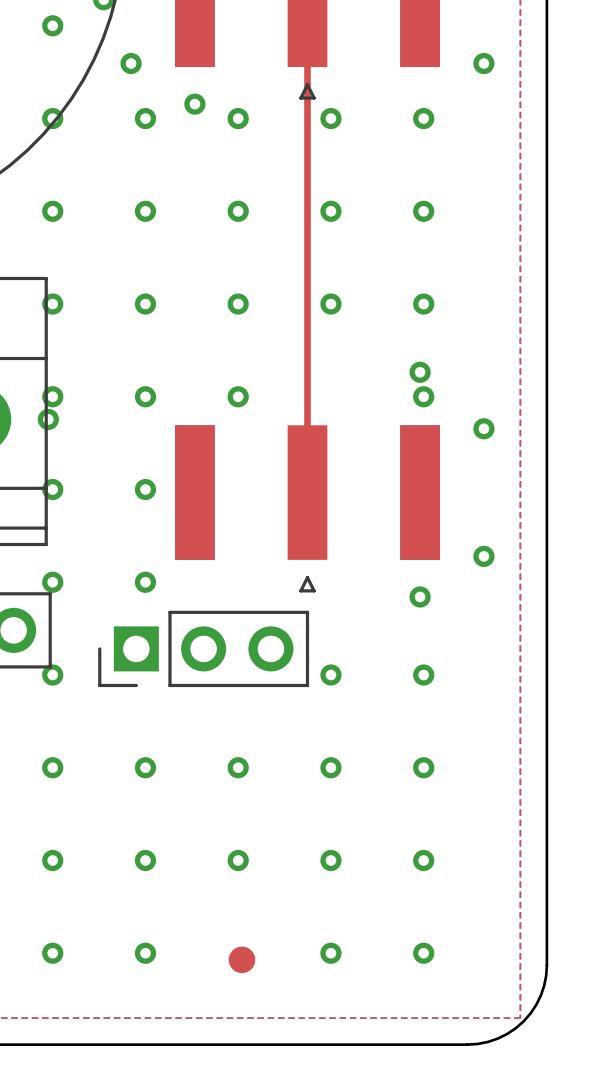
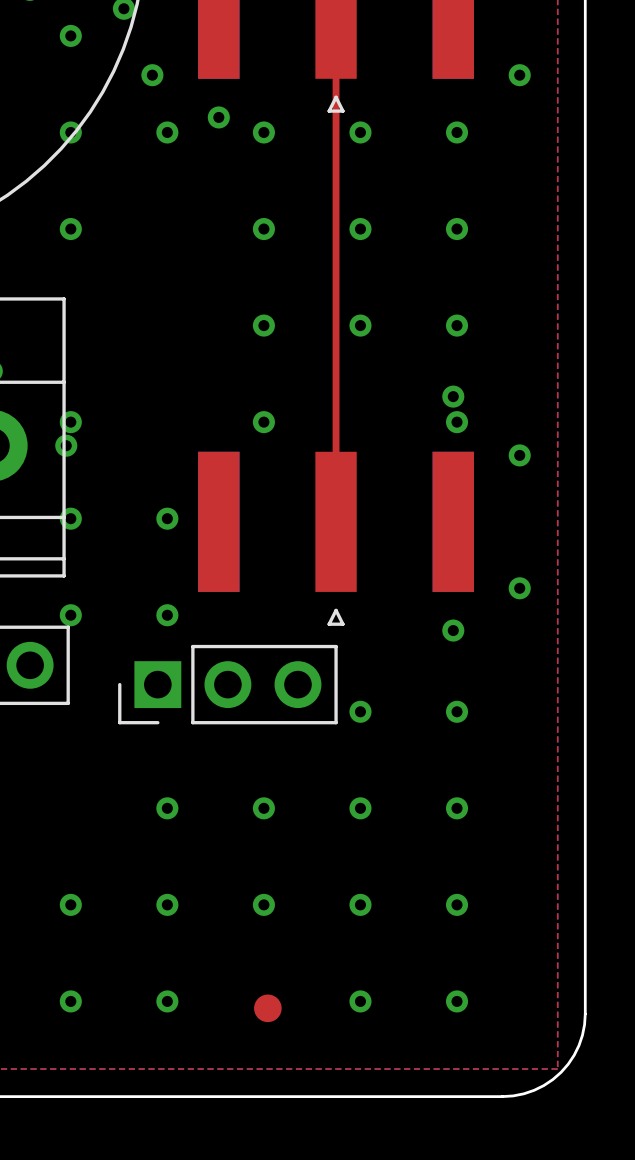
via: (145, 211) -> none
via: (52, 304) -> none
via: (145, 304) -> none
via: (145, 396) -> none
via: (52, 675) -> none
via: (52, 767) -> none

